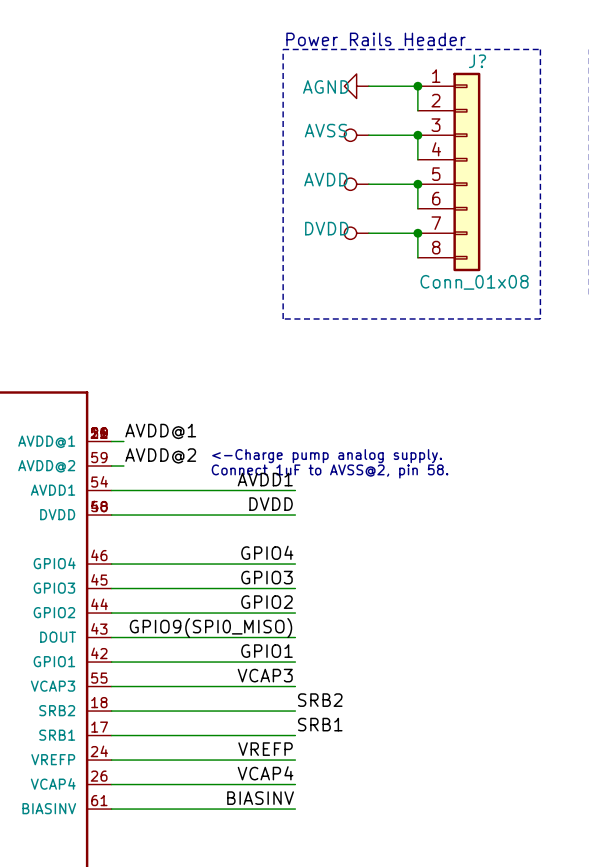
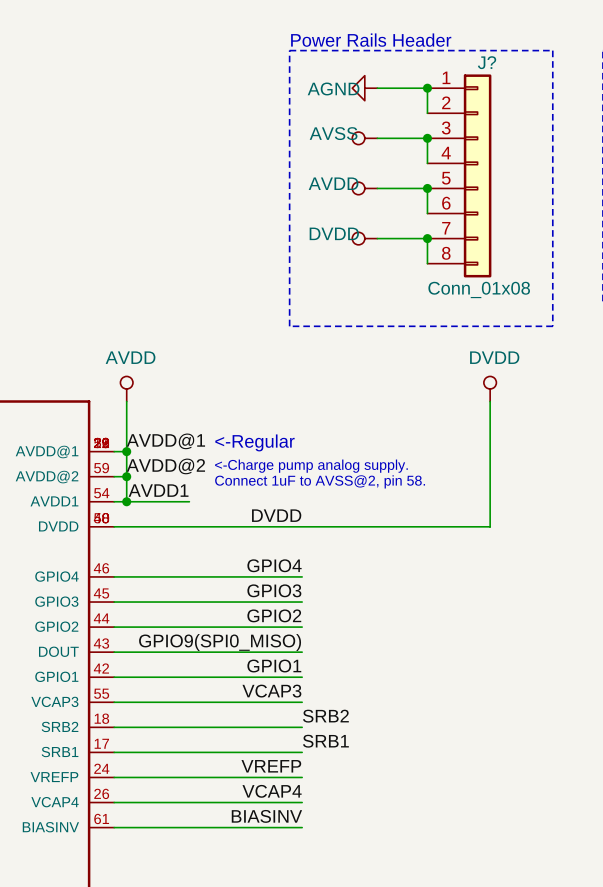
power symbol: none -> AVDD (126, 388)
power symbol: none -> DVDD (490, 388)
wire: none -> (126, 401) (126, 501)
wire: none -> (490, 401) (490, 526) (302, 526)
text: none -> <-Regular (254, 442)
junction: none -> (126, 451)
junction: none -> (126, 476)
label position: AVDD1 (265, 479) -> AVDD1 (158, 490)
junction: none -> (126, 501)
wire: (185, 490) (295, 490) -> none

